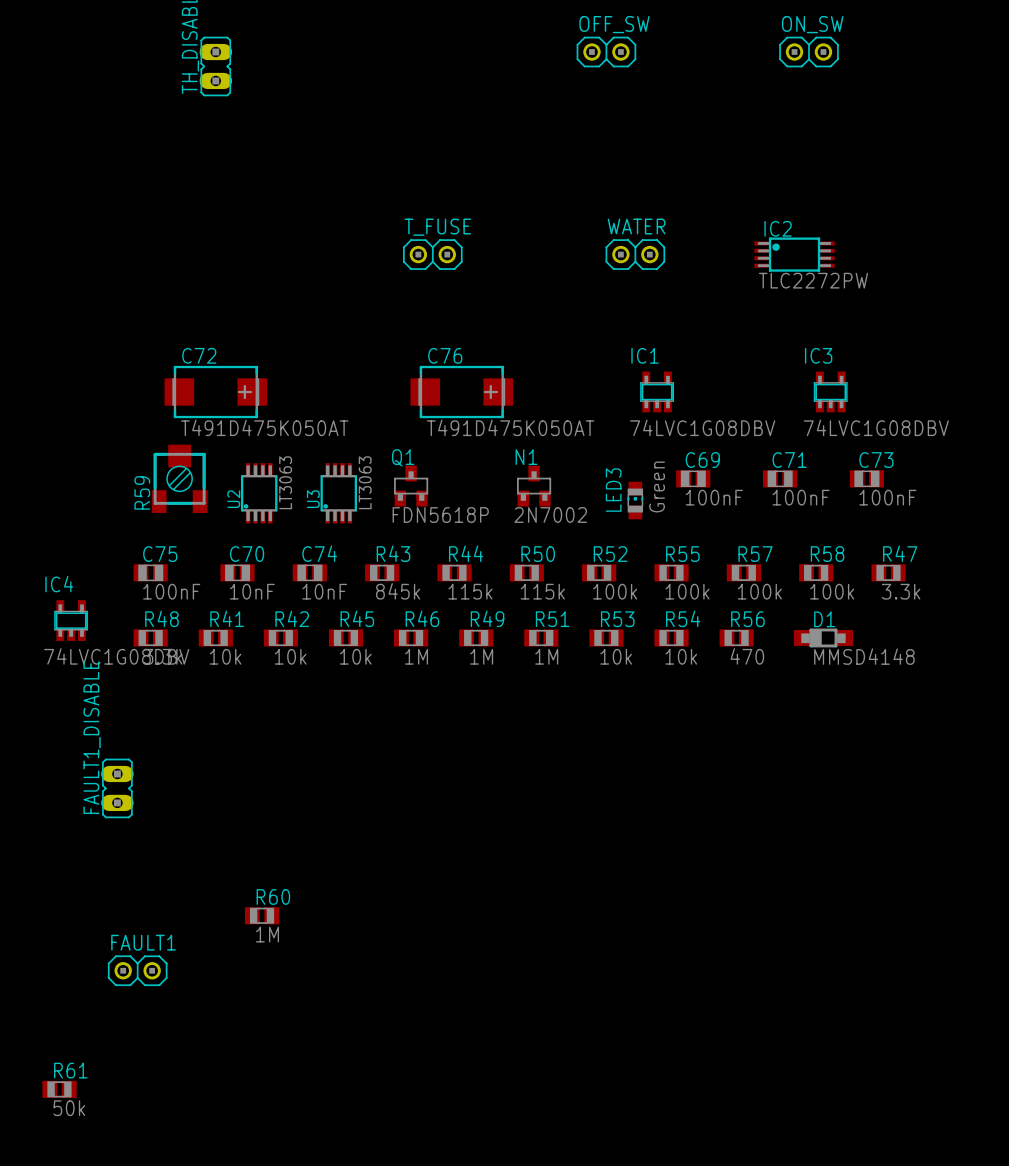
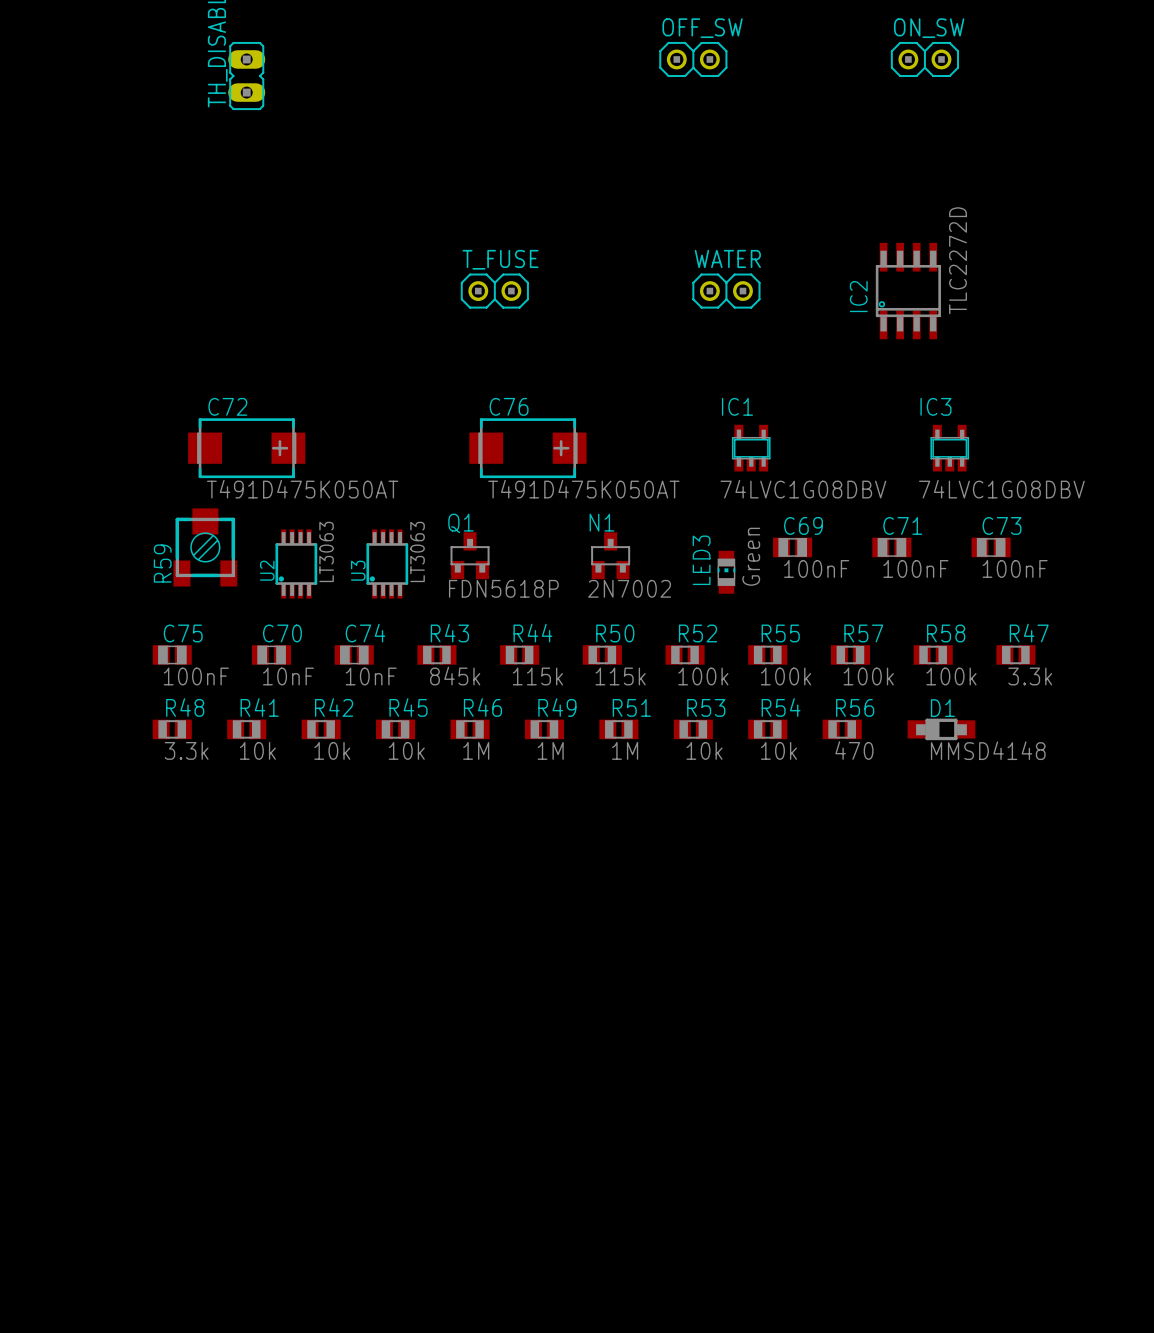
IC2 name position: IC2 (778, 228) -> IC2 (858, 296)
IC2 footprint: [754, 237, 835, 272] -> [875, 242, 941, 340]
IC2 value: TLC2272PW (813, 280) -> TLC2272D (958, 260)
IC4: 74LVC1G08DBV (71, 620) -> none
FAULT1_DISABLE: (117, 788) -> none
R60: 1M (262, 915) -> none
FAULT1: (137, 970) -> none
R61: 50k (59, 1089) -> none

